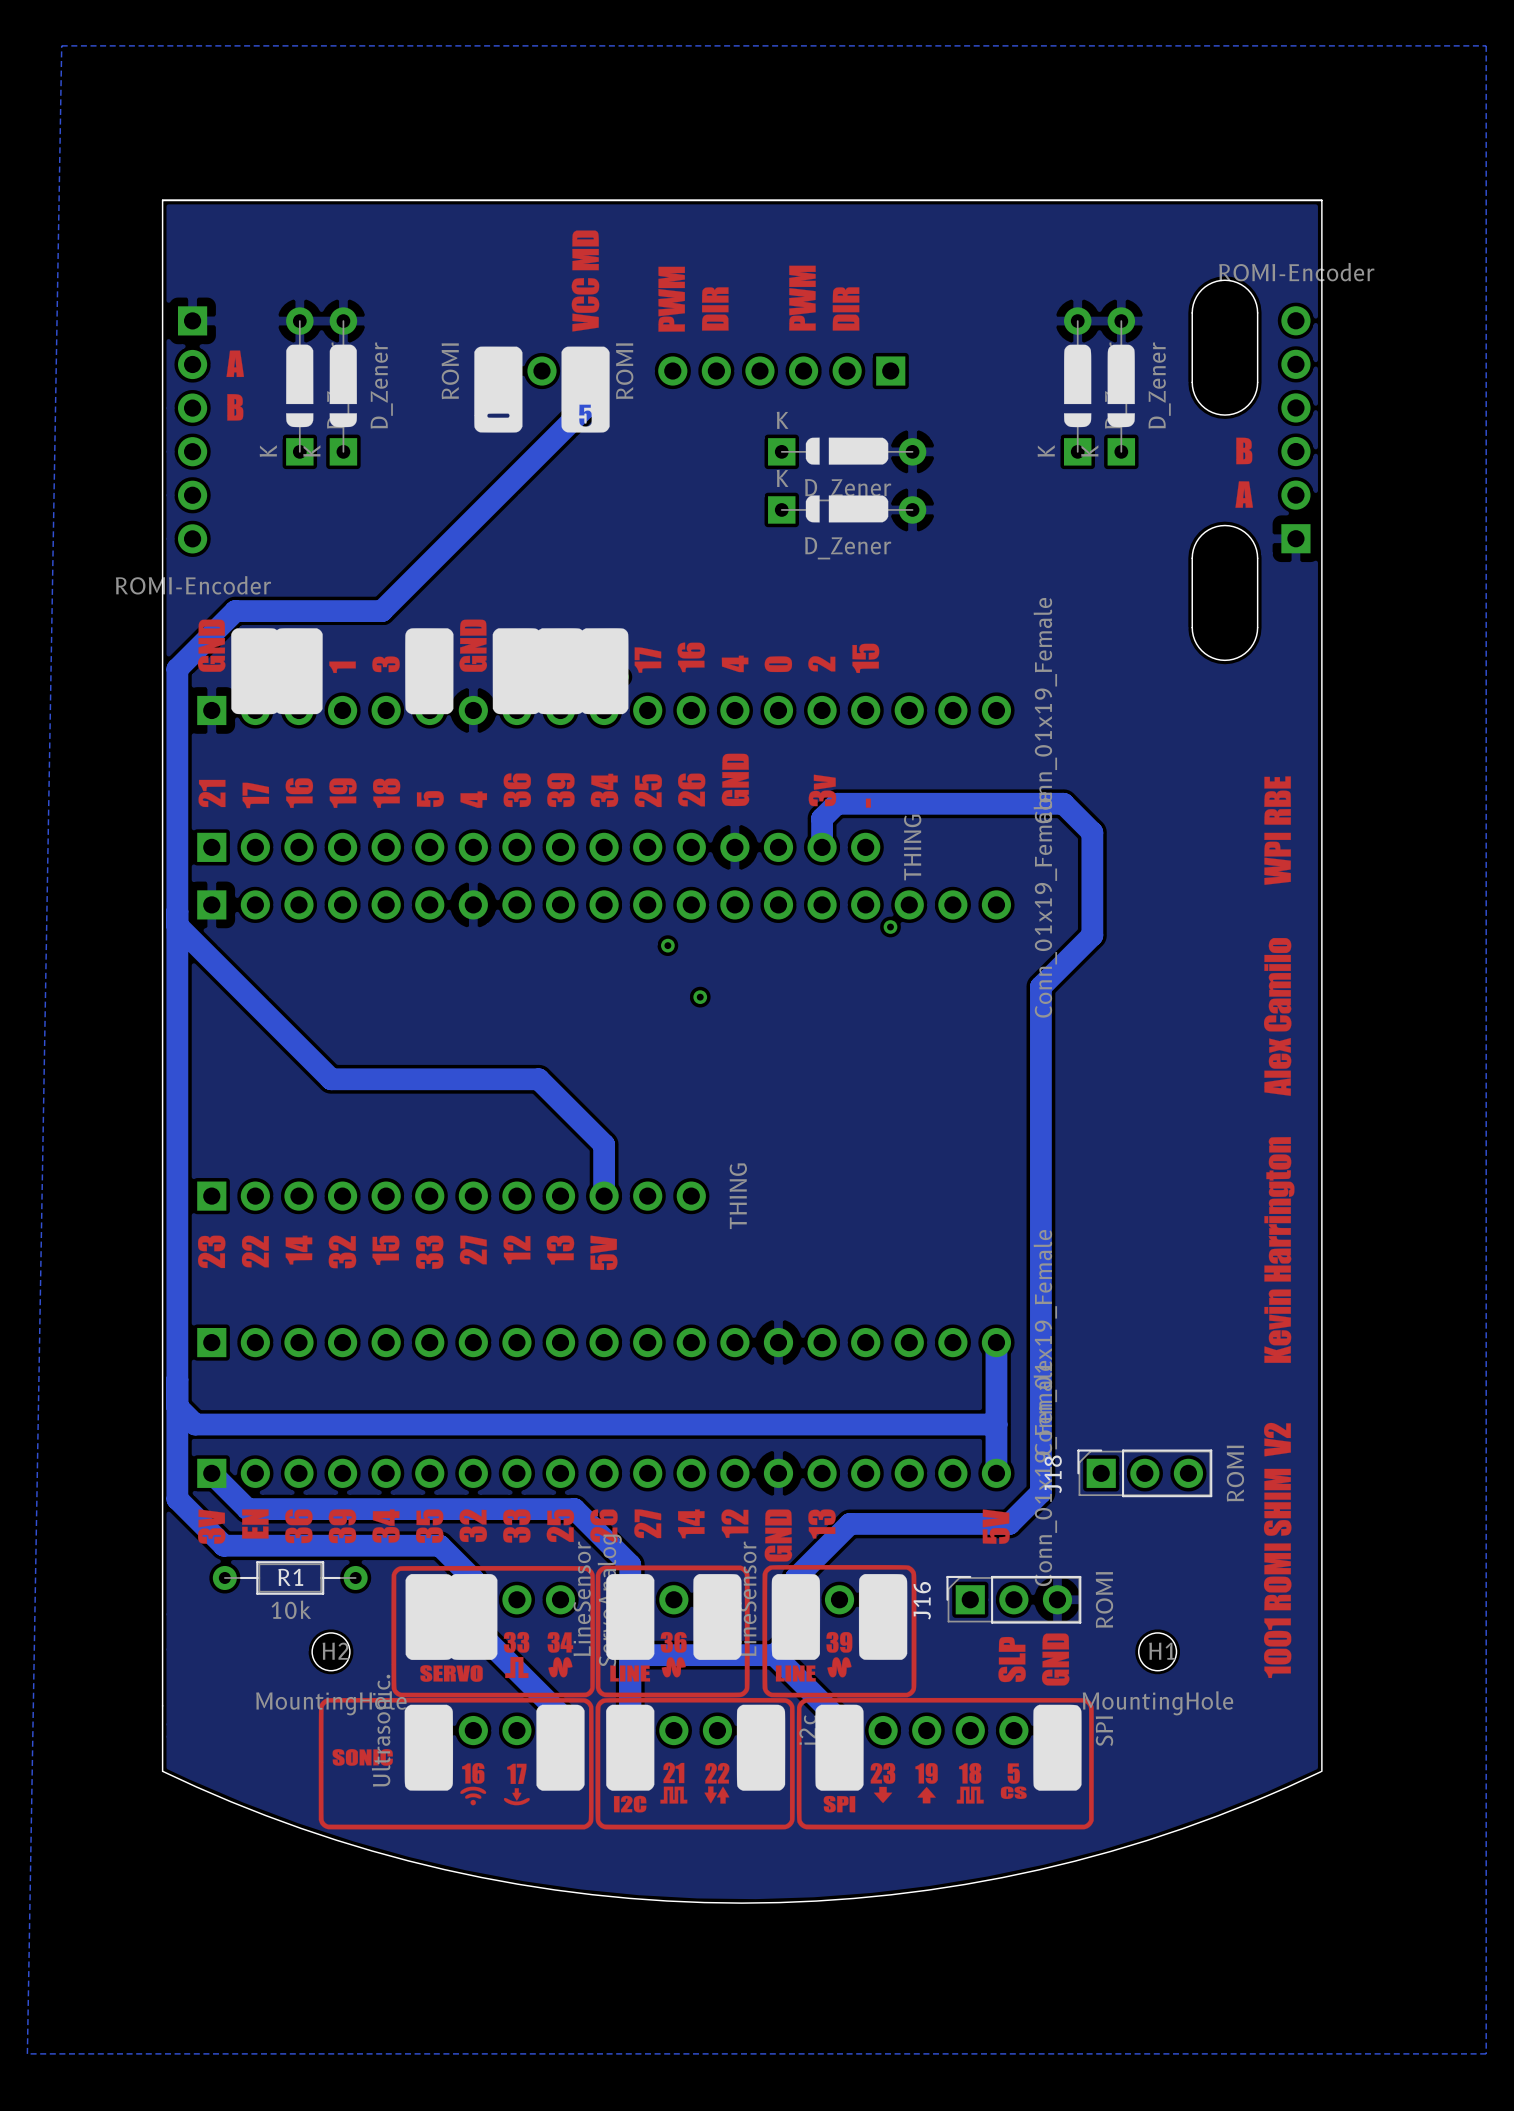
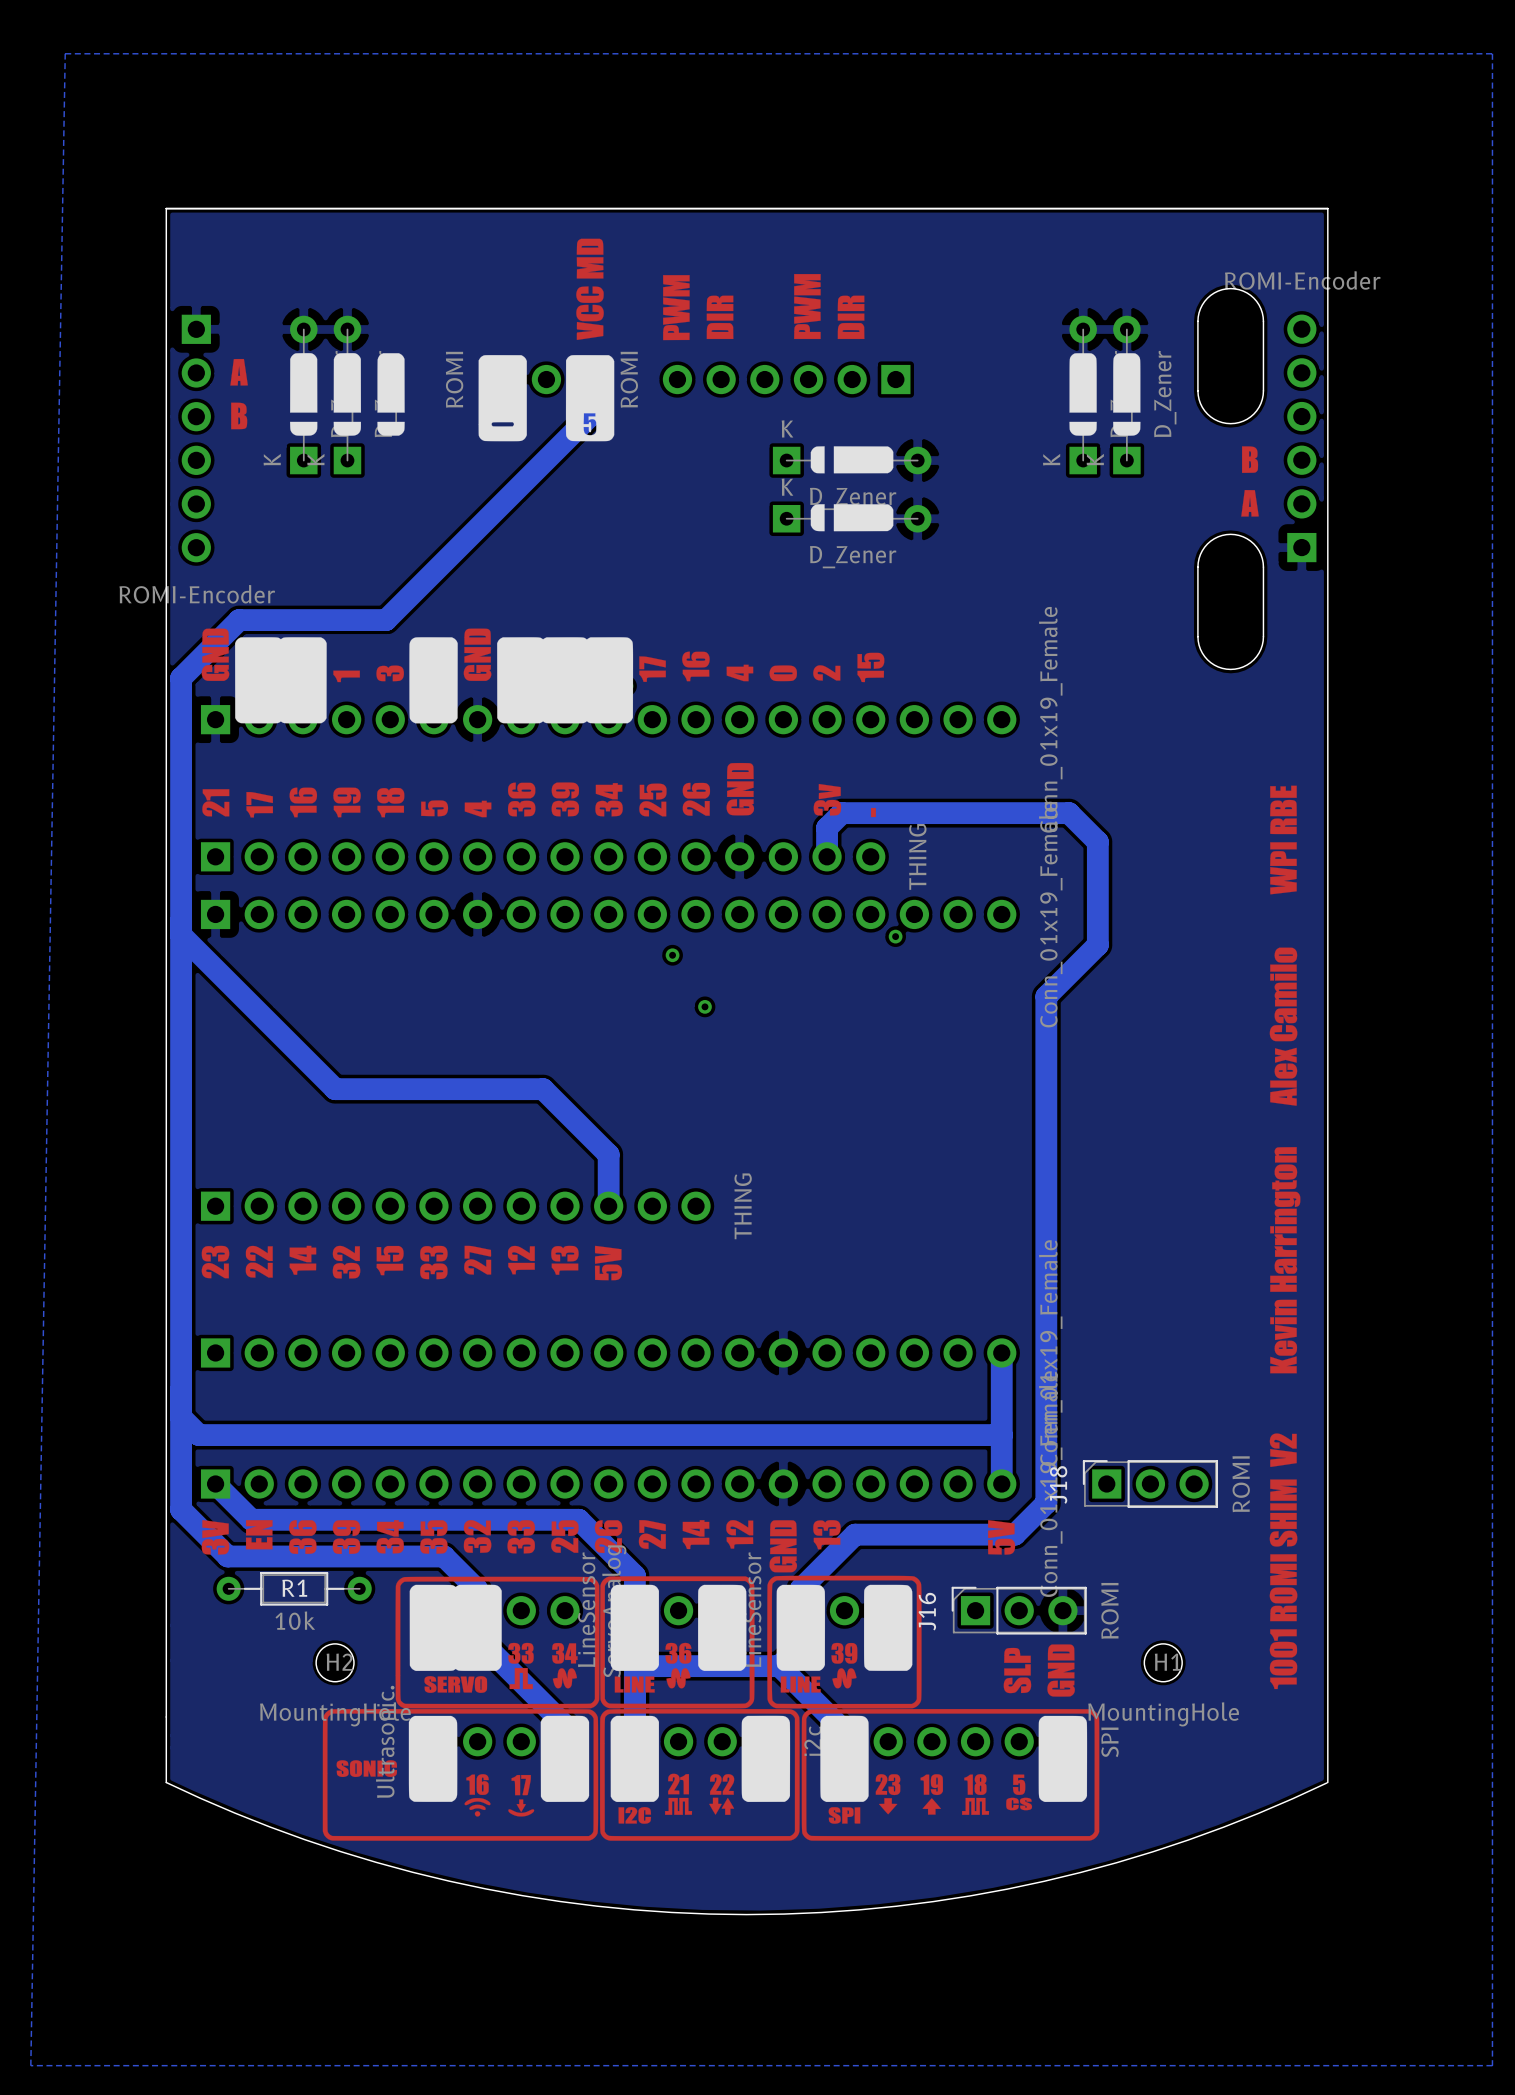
drawing shape: [197, 230, 1295, 1830] -> [201, 238, 1301, 1841]

